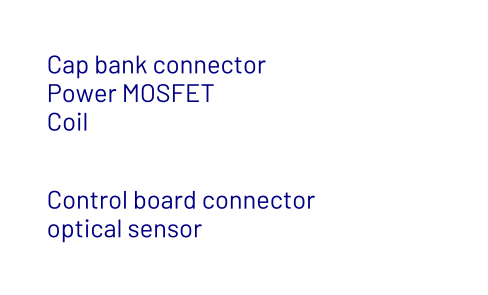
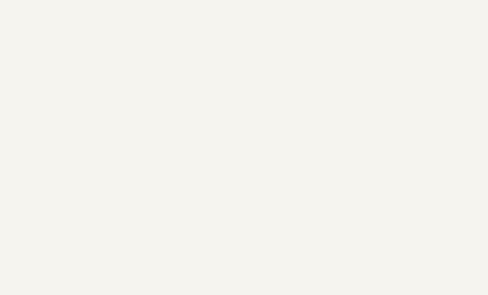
text: Cap bank connector (157, 66) -> none
text: Power MOSFET (131, 93) -> none
text: Coil (67, 121) -> none
text: Control board connector (181, 199) -> none
text: optical sensor (125, 230) -> none

